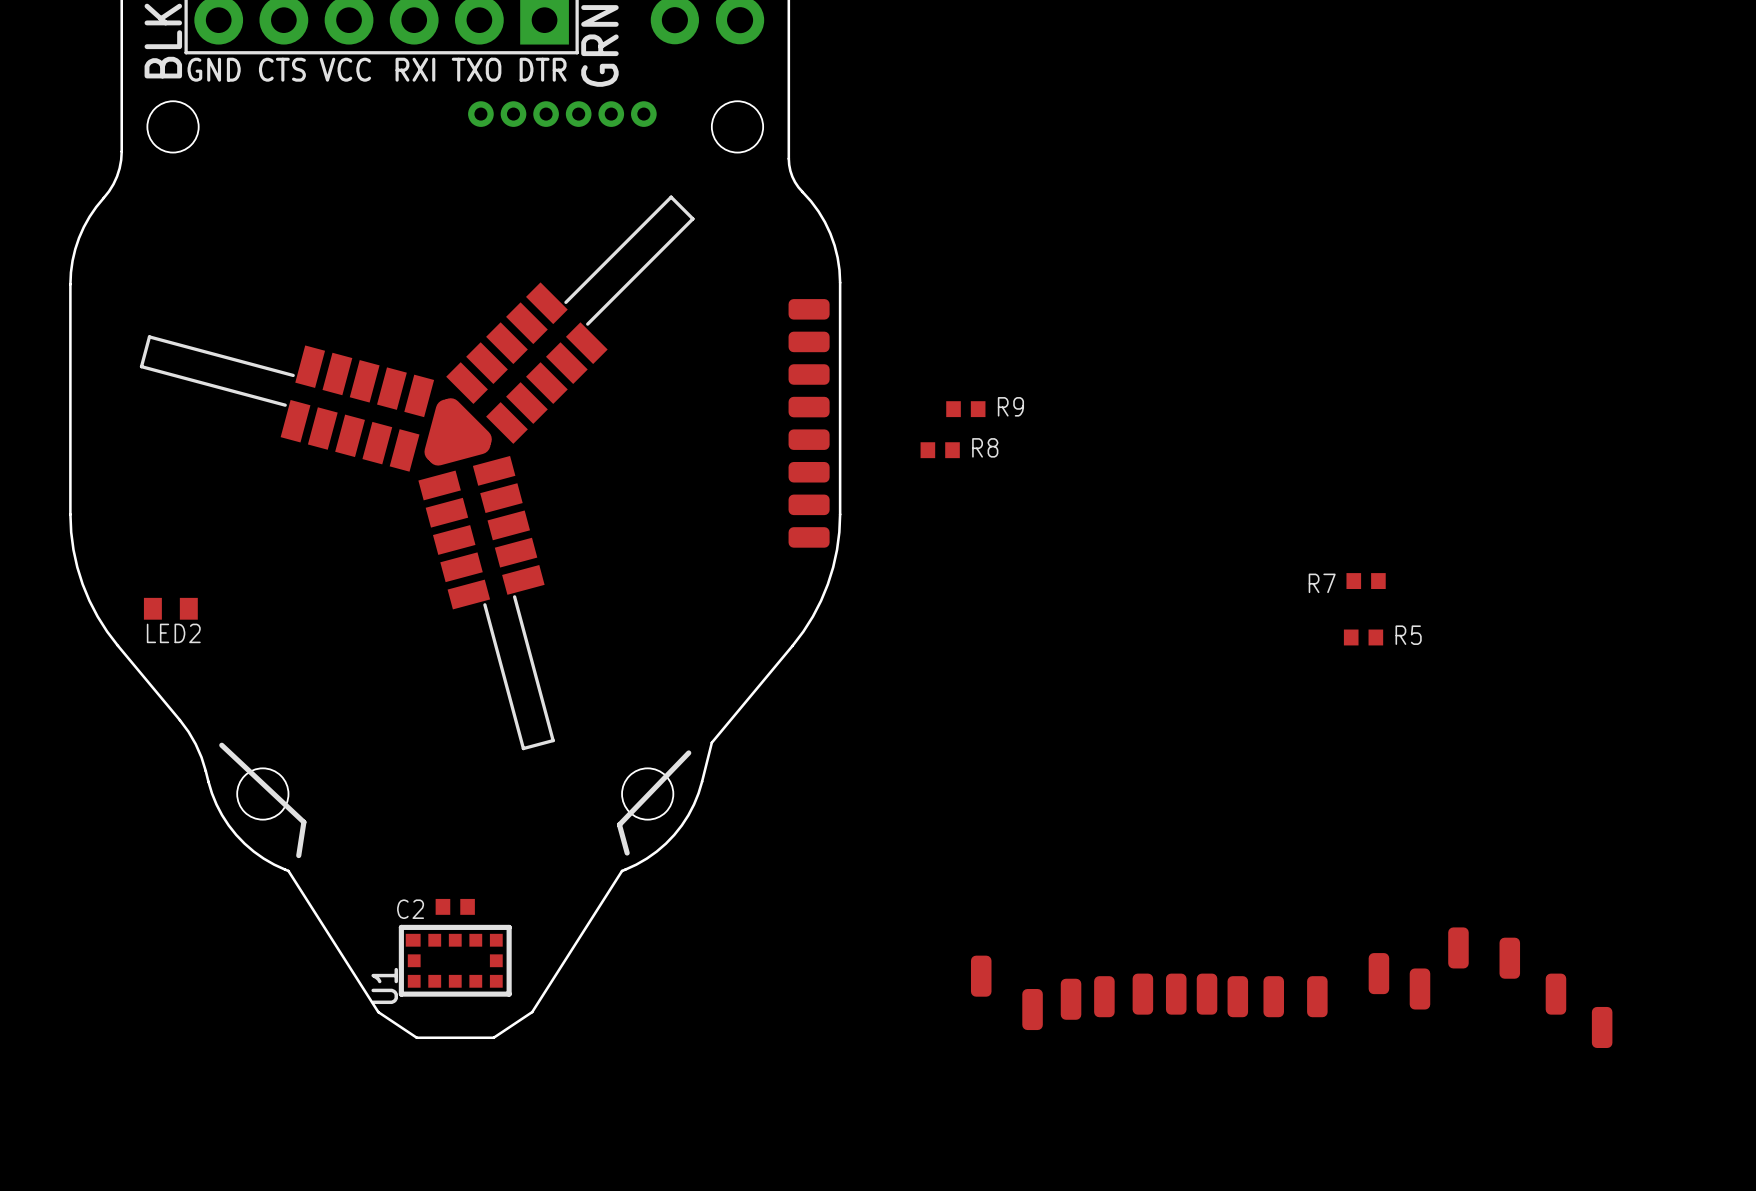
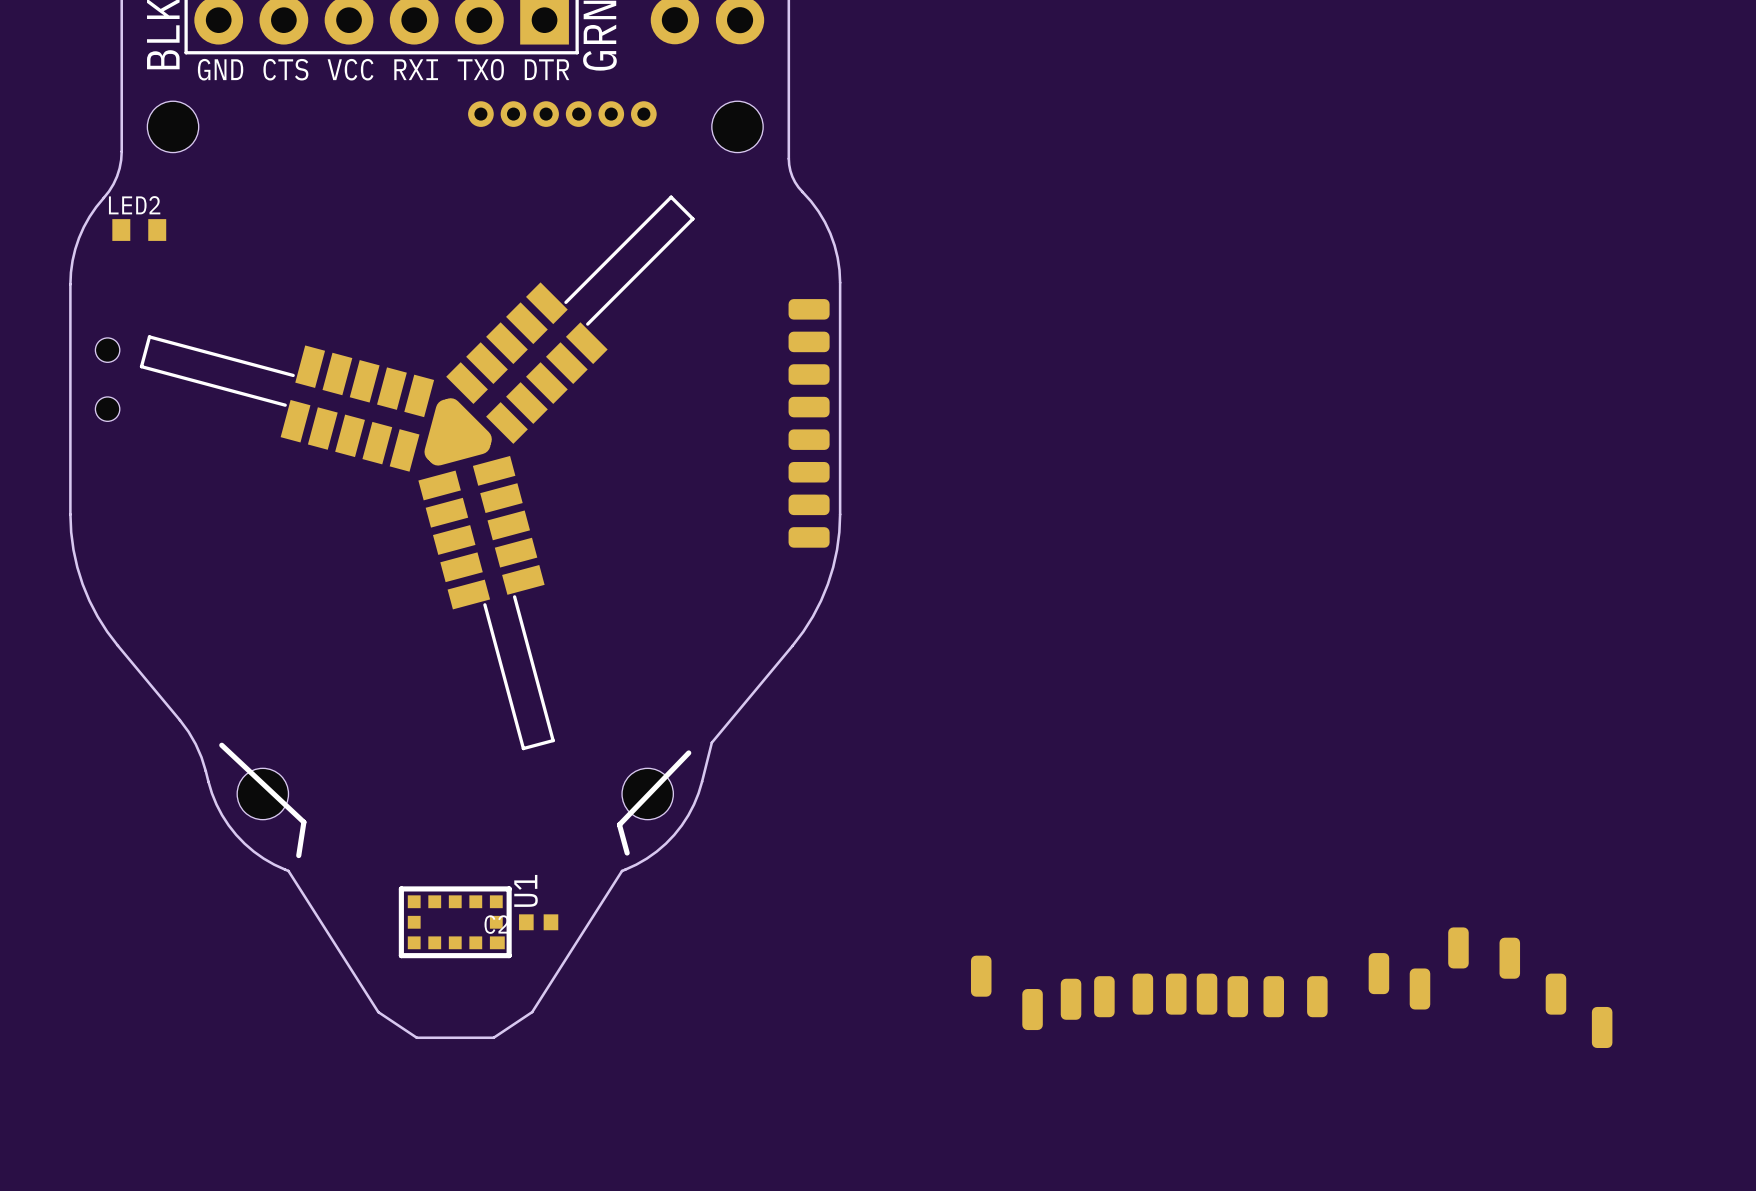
part: none -> (107, 379)
R9: (965, 409) -> none
R8: (940, 450) -> none
R7: (1366, 581) -> none
LED2 position: (170, 608) -> (139, 230)
LED2 name position: LED2 (173, 633) -> LED2 (134, 205)
R5: (1363, 637) -> none
C2 position: (455, 906) -> (538, 922)
U1 rotation: 0° (455, 960) -> 180° (455, 922)

